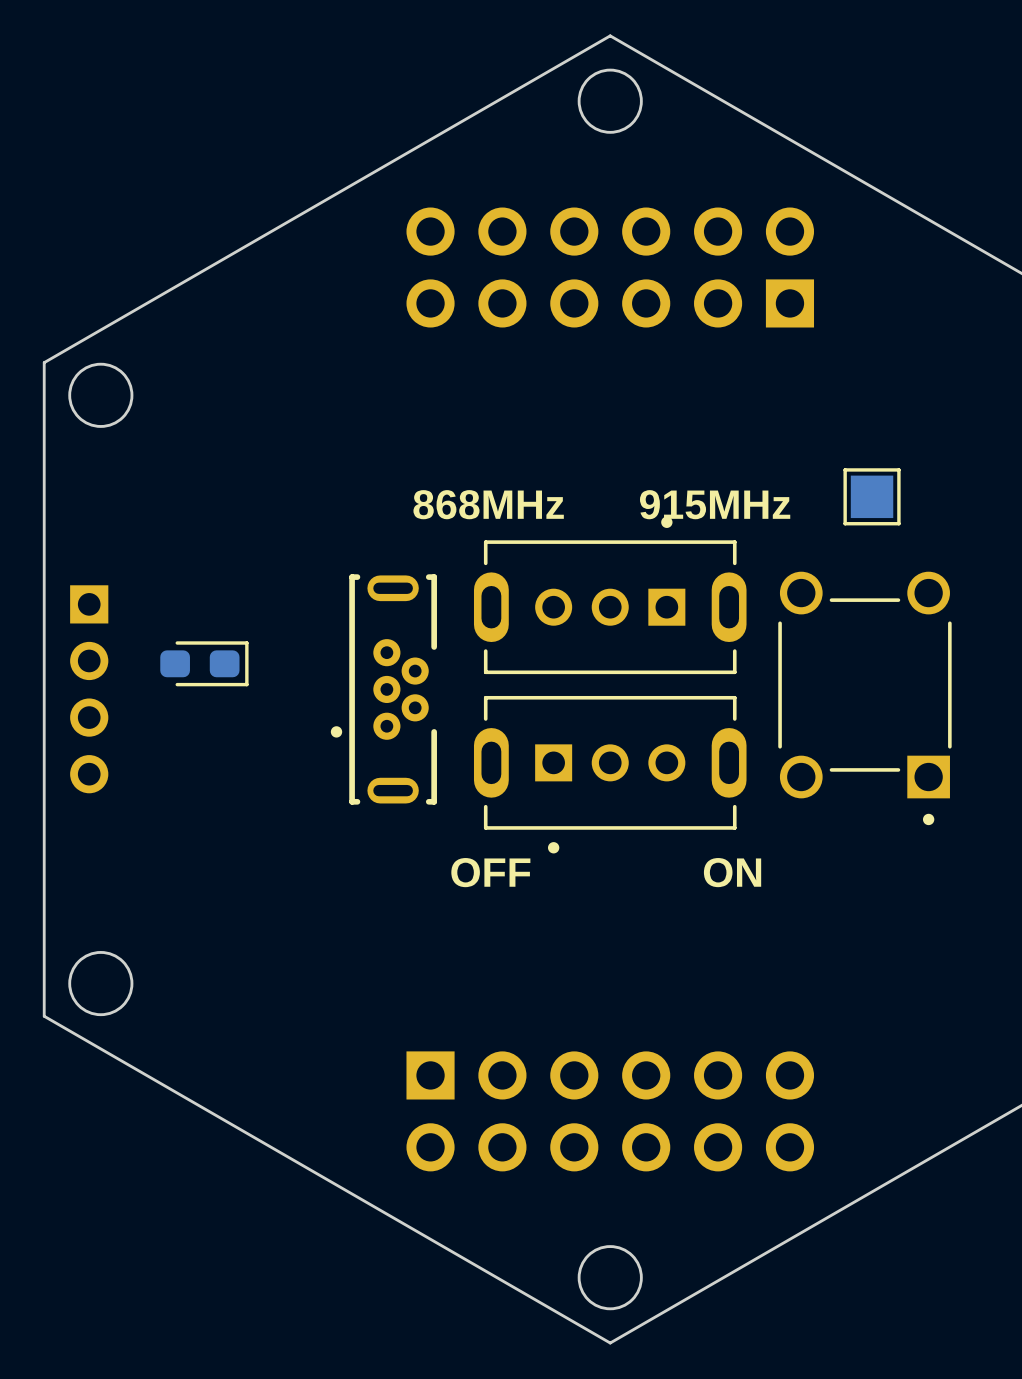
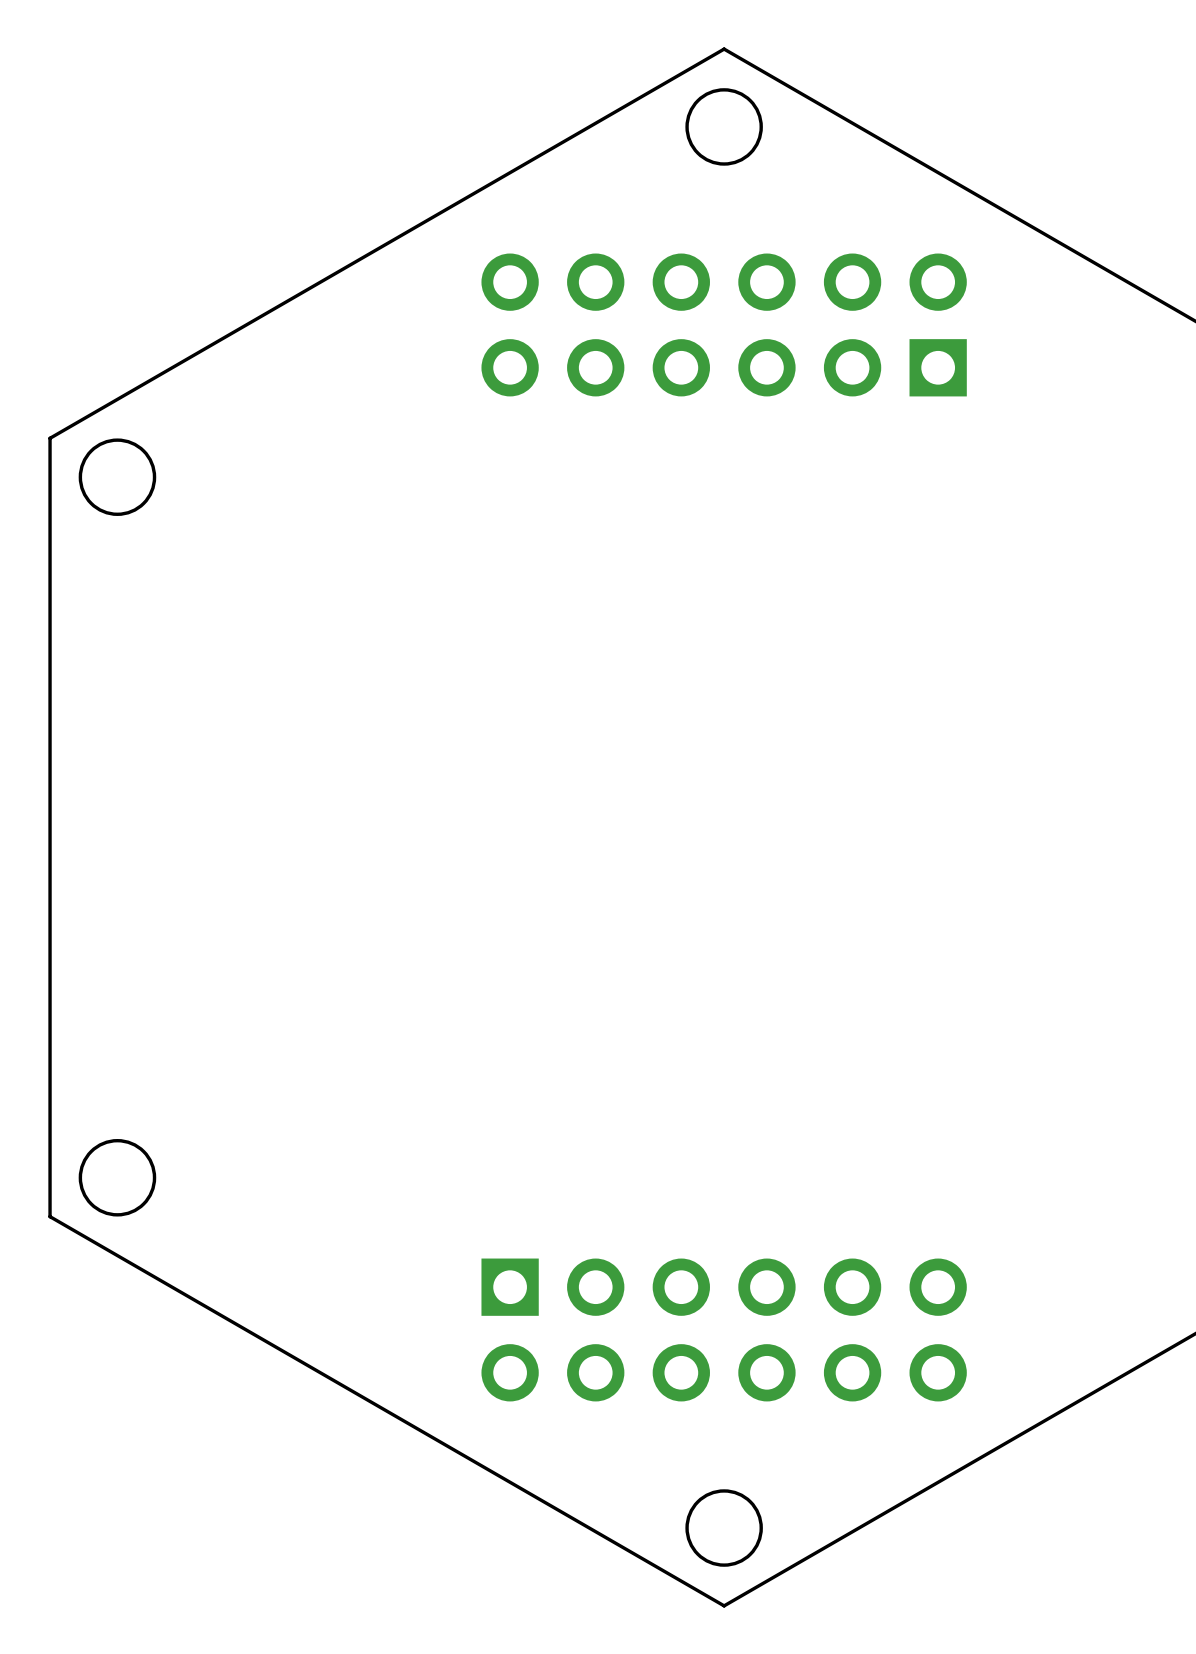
part: (872, 496) -> none
text: 868MHz (488, 504) -> none
text: 915MHz (715, 504) -> none
part: (610, 595) -> none
part: (204, 663) -> none
part: (89, 689) -> none
part: (383, 689) -> none
part: (864, 698) -> none
part: (610, 774) -> none
text: OFF (490, 872) -> none
text: ON (732, 872) -> none

